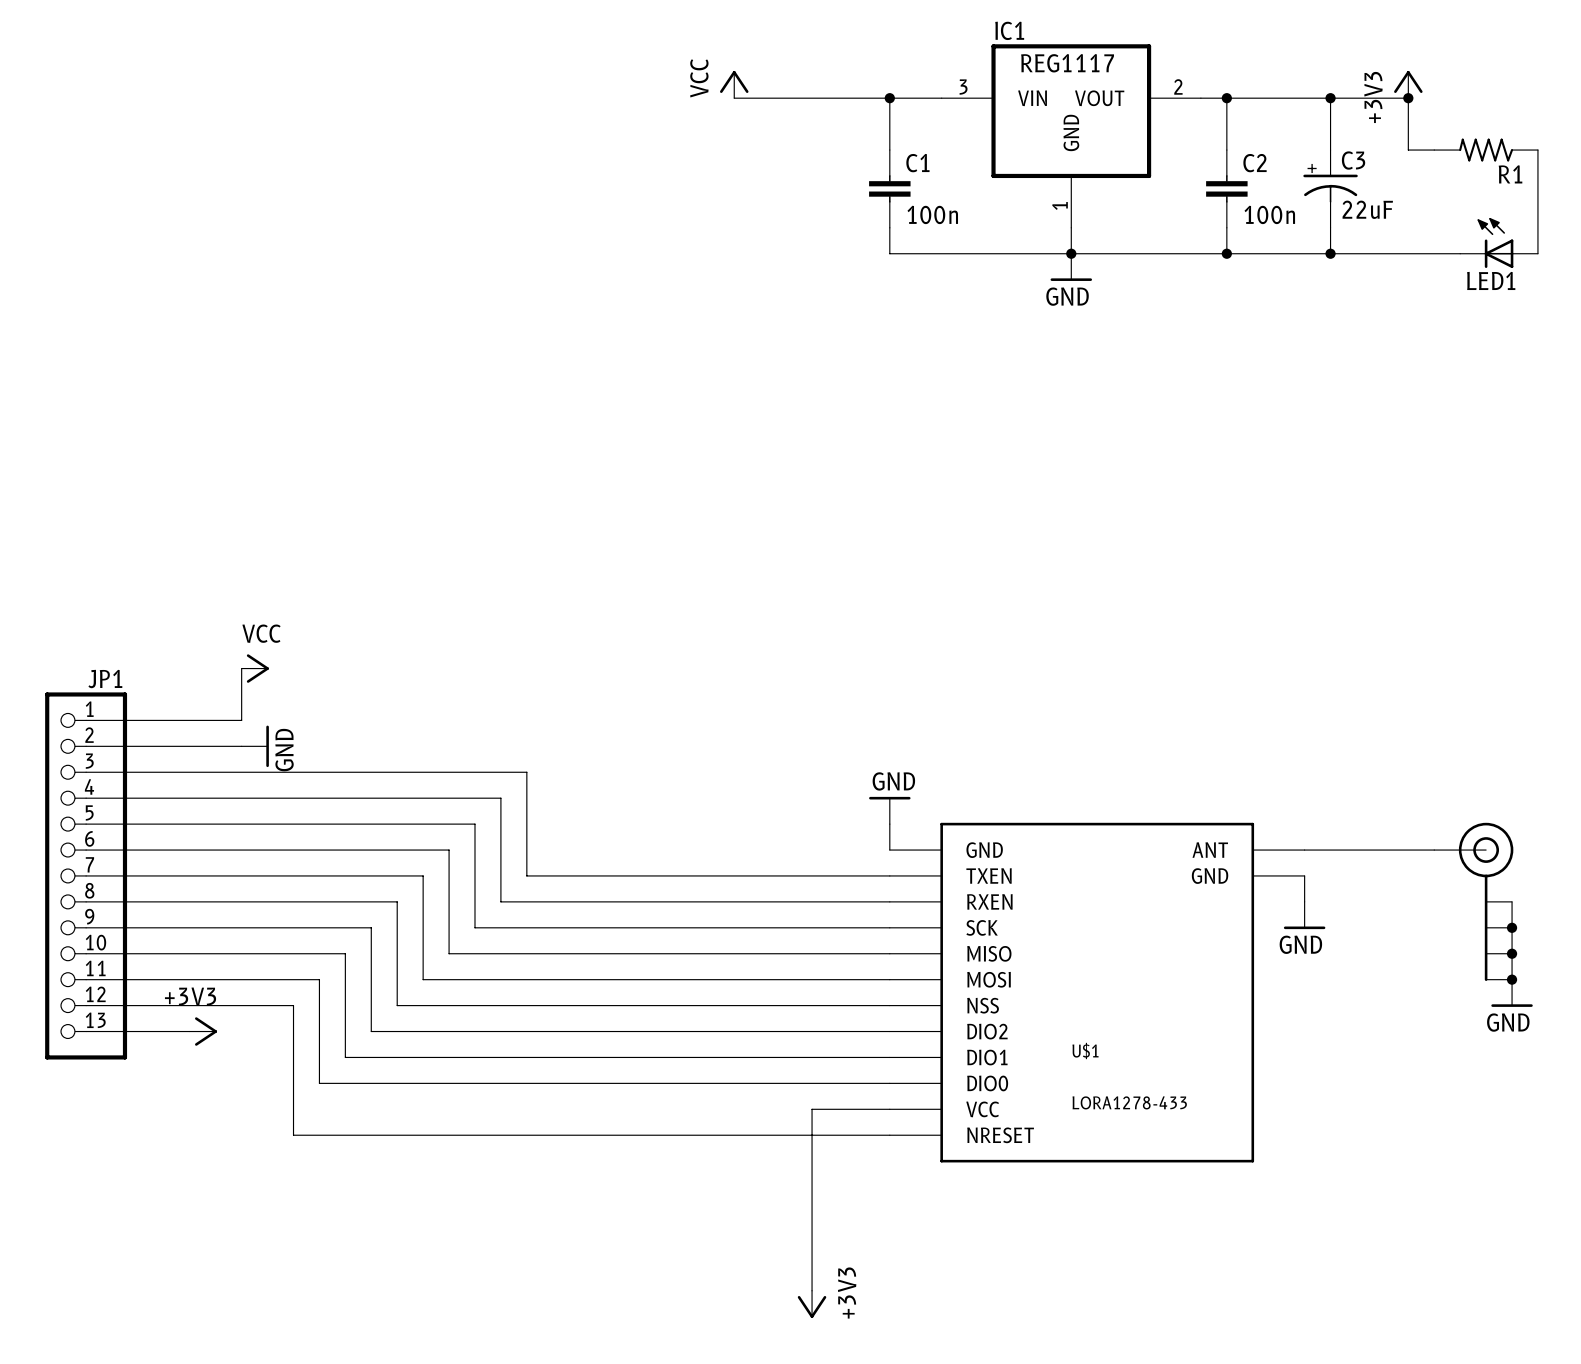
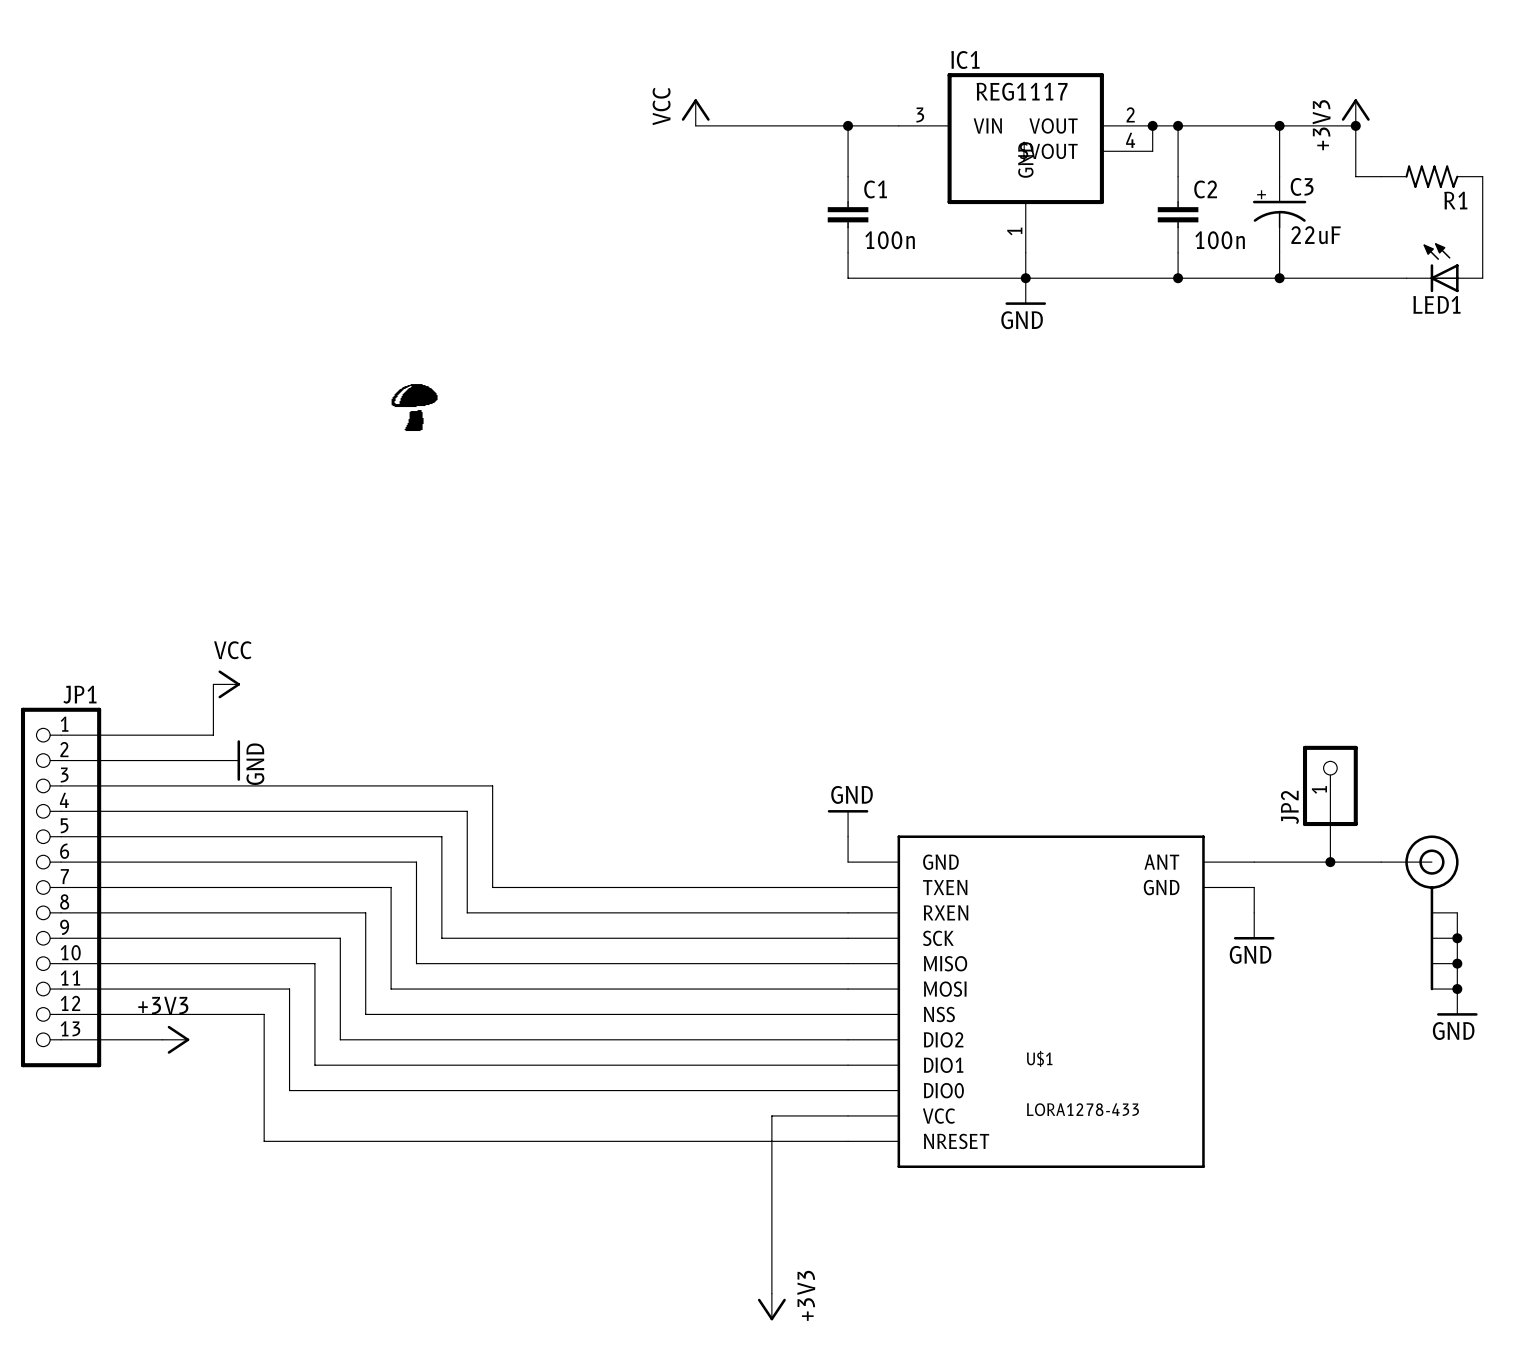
IC1 symbol: [941, 44, 1201, 228] -> [898, 73, 1153, 253]
wire: none -> (1152, 125) (1152, 151)
junction: none -> (1152, 125)
part: none -> (414, 407)
wire: none -> (1330, 785) (1330, 862)
JP2: none -> (1330, 785)
junction: none -> (1330, 862)

